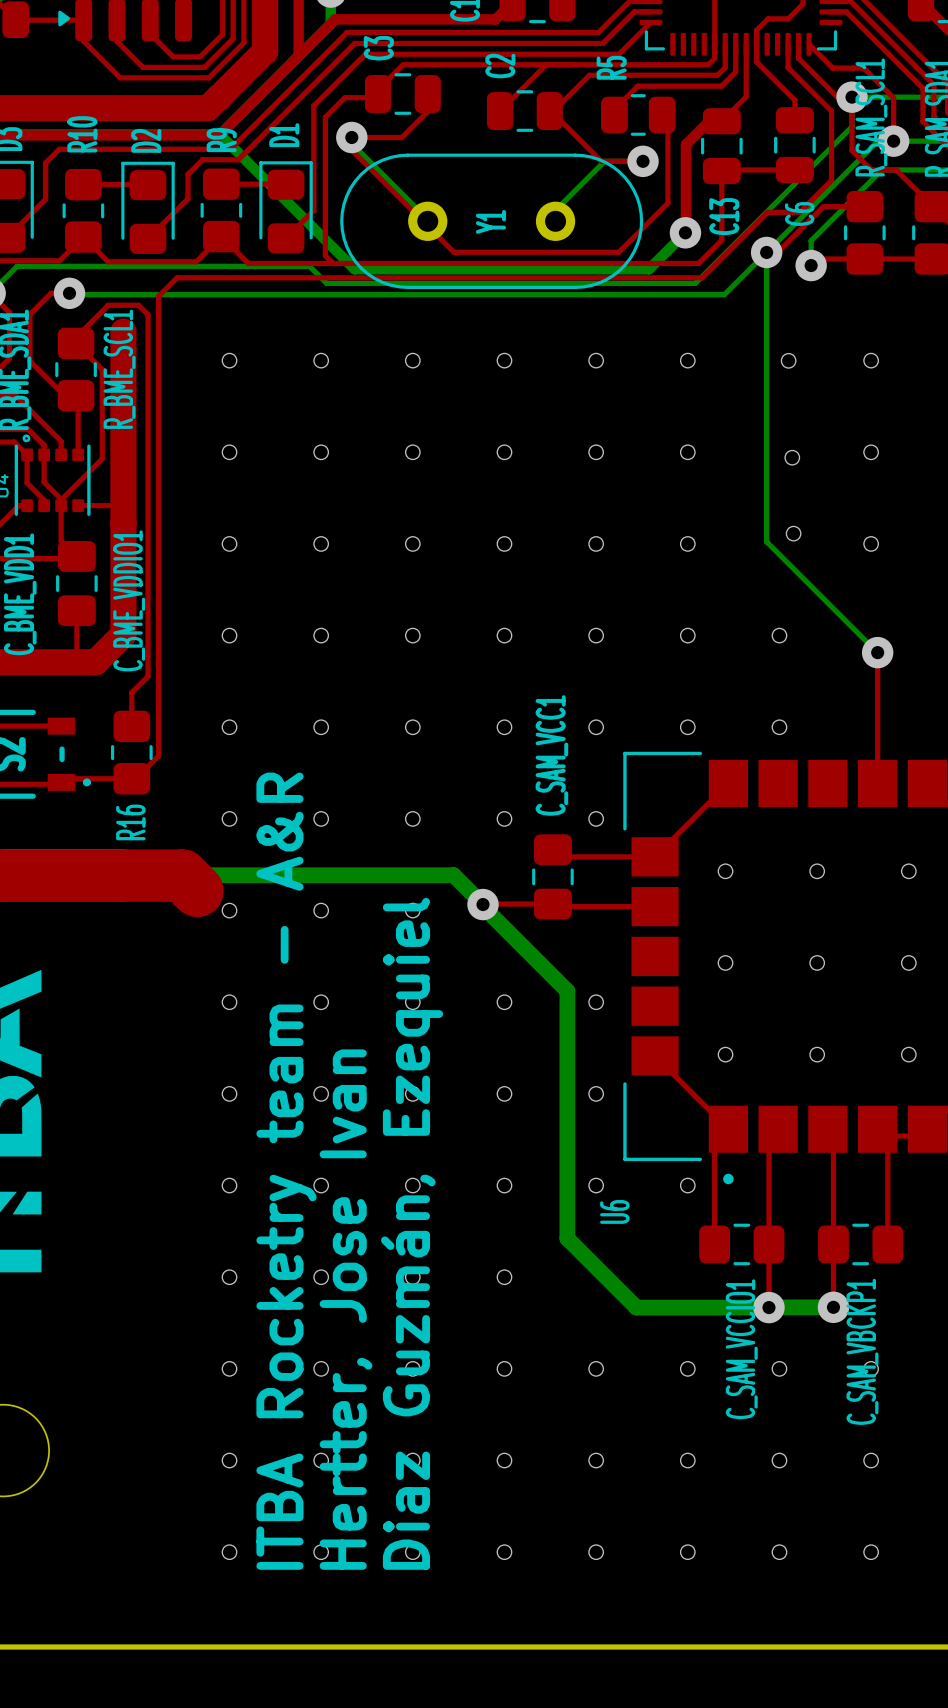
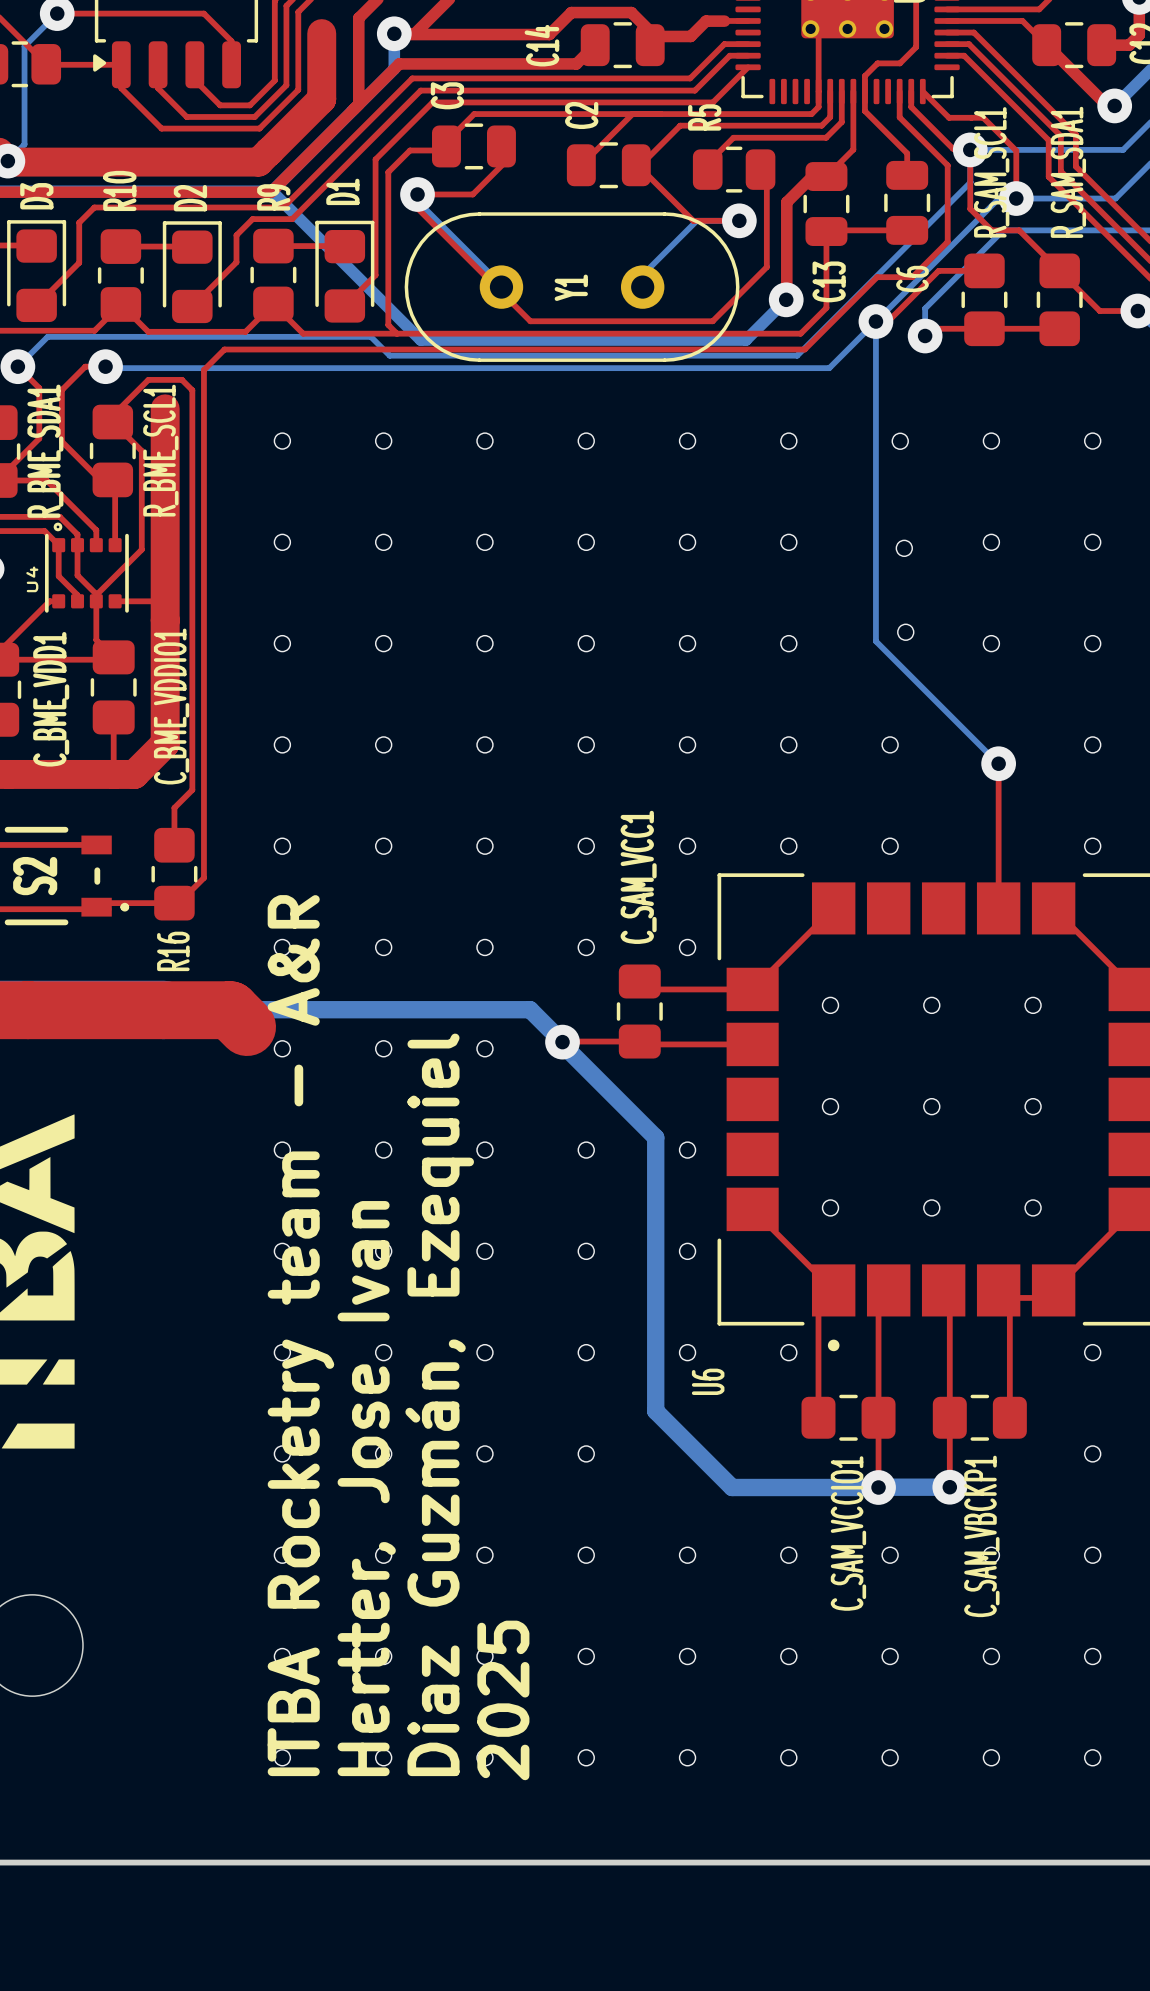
text position: ITBA Rocketry team - A&R (286, 1171) -> ITBA Rocketry team - A&R (300, 1335)
text position: Diaz Guzmán, Ezequiel (412, 1233) -> Diaz Guzmán, Ezequiel (439, 1404)
text position: Hertter, Jose Ivan (346, 1309) -> Hertter, Jose Ivan (366, 1488)
text: none -> 2025 (503, 1700)

